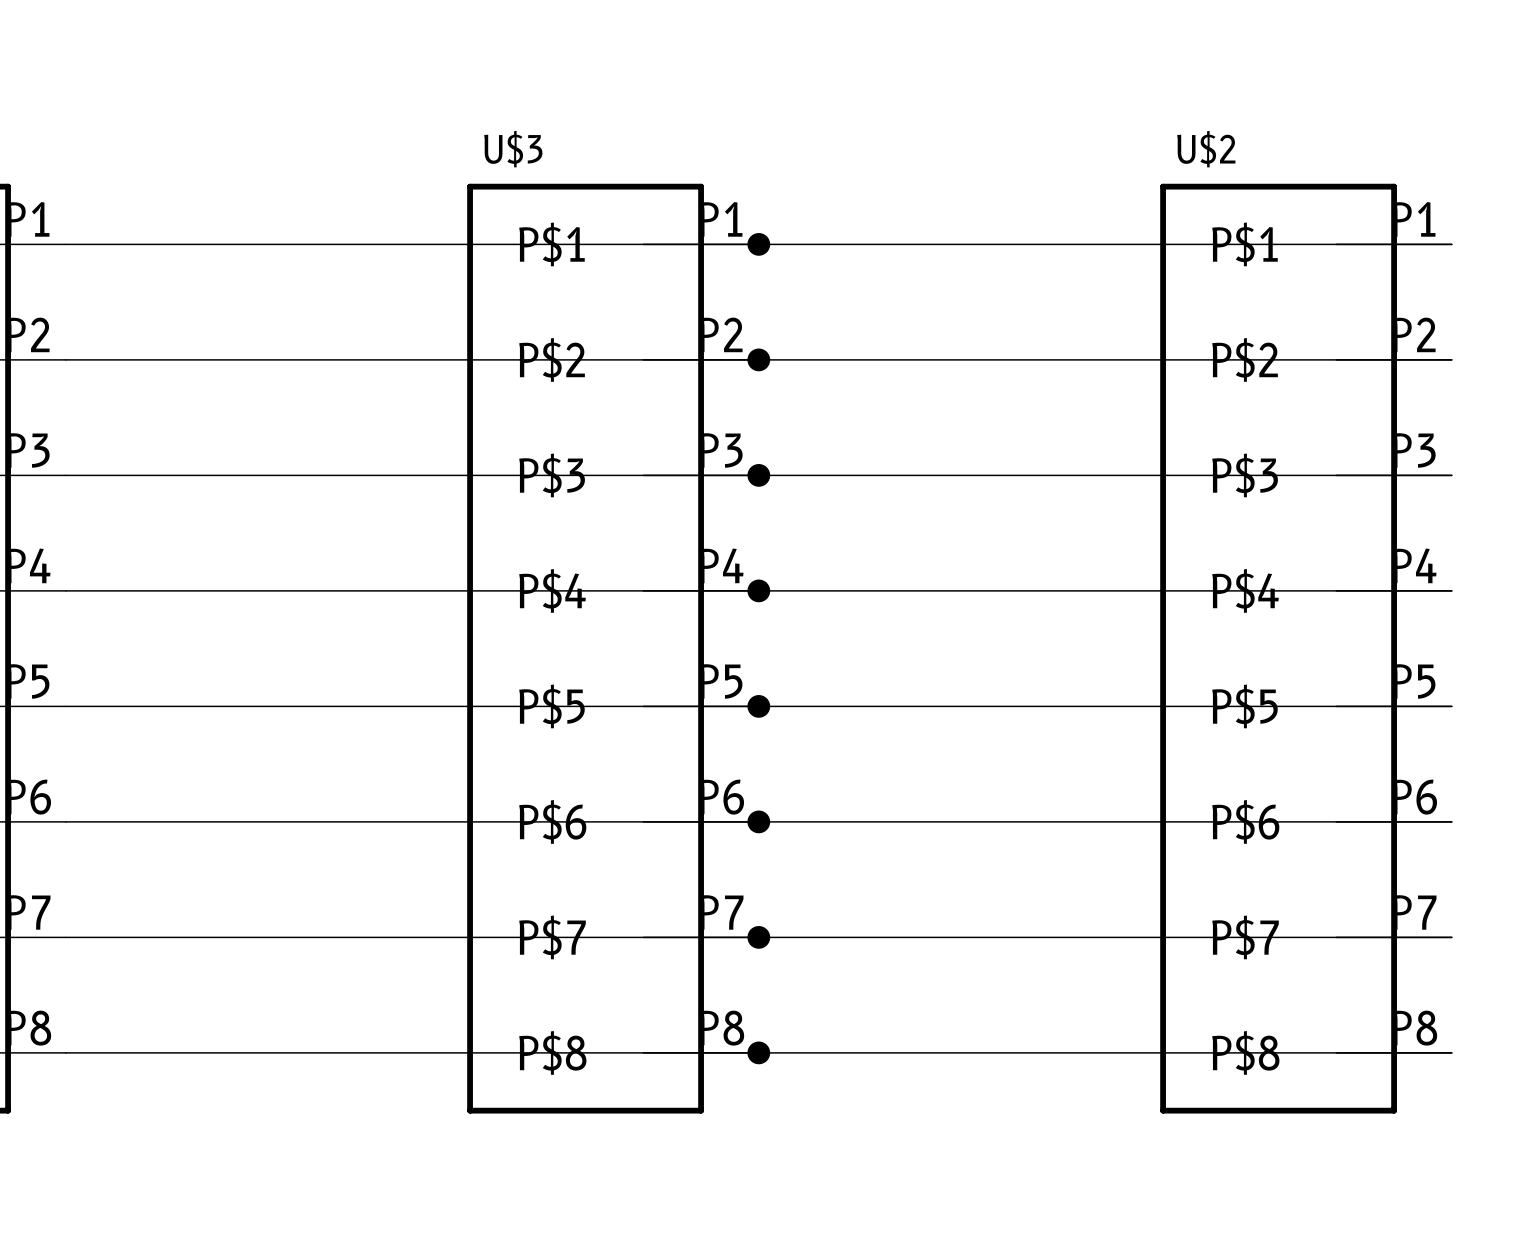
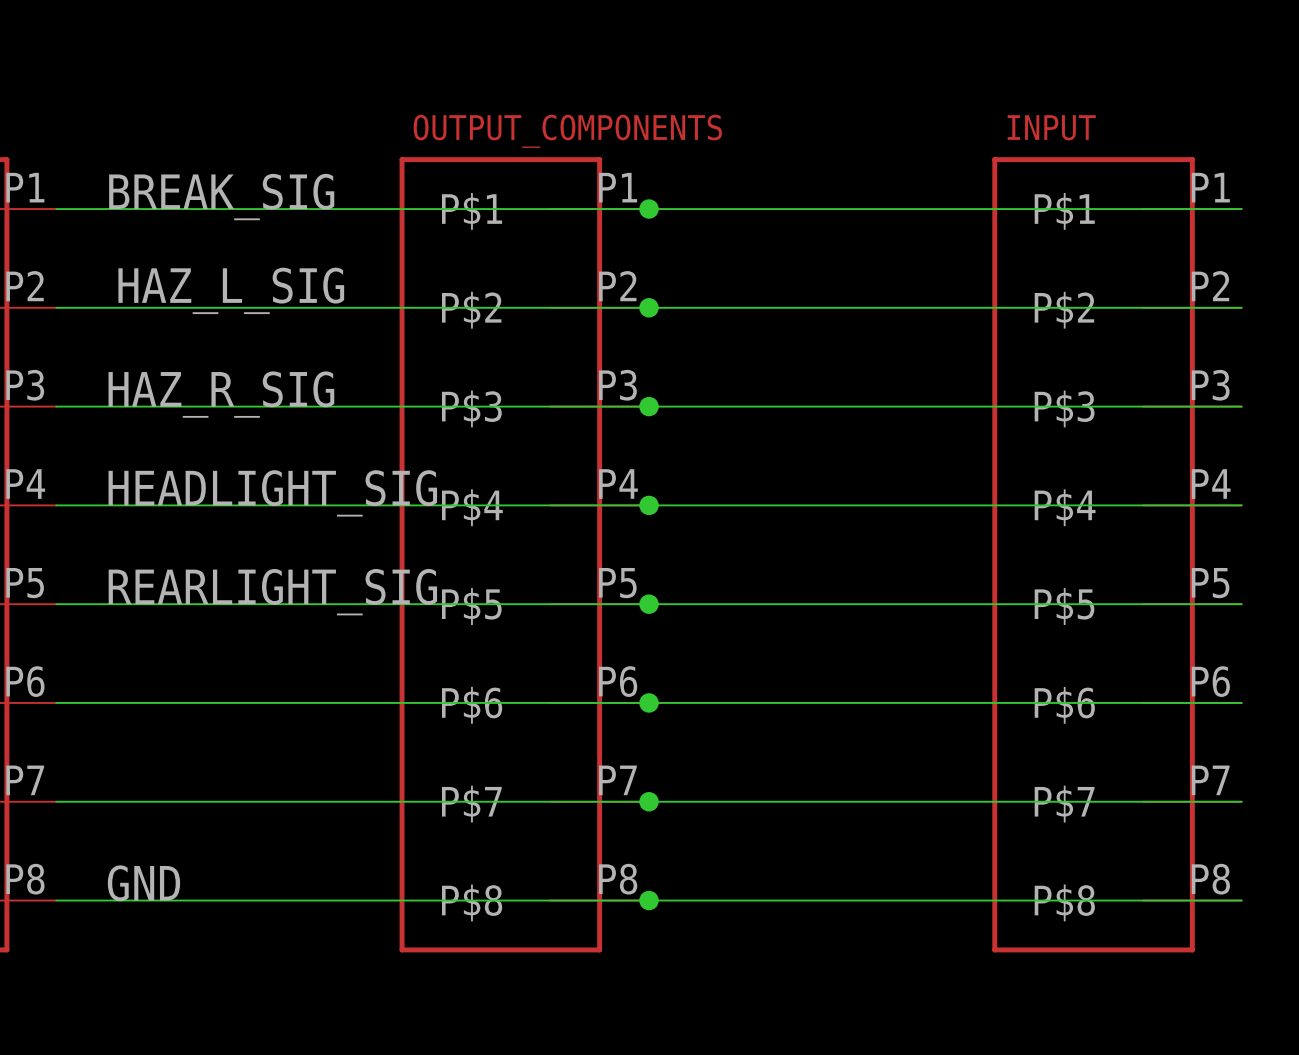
U$3 name: U$3 (513, 149) -> OUTPUT_COMPONENTS (567, 131)
U$2 name: U$2 (1206, 149) -> INPUT (1051, 127)
label: none -> BREAK_SIG (221, 197)
label: none -> HAZ_L_SIG (231, 290)
label: none -> HAZ_R_SIG (221, 394)
label: none -> HEADLIGHT_SIG (272, 493)
label: none -> REARLIGHT_SIG (272, 592)
label: none -> GND (143, 883)

